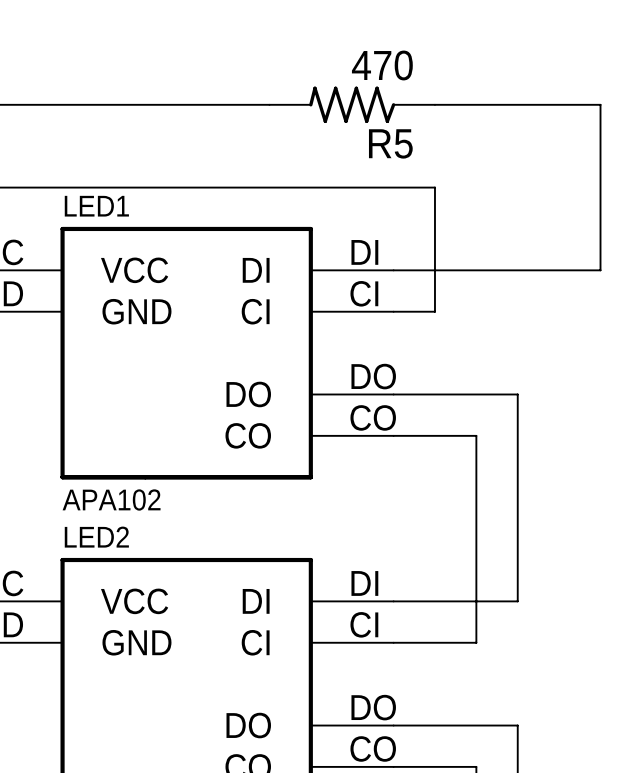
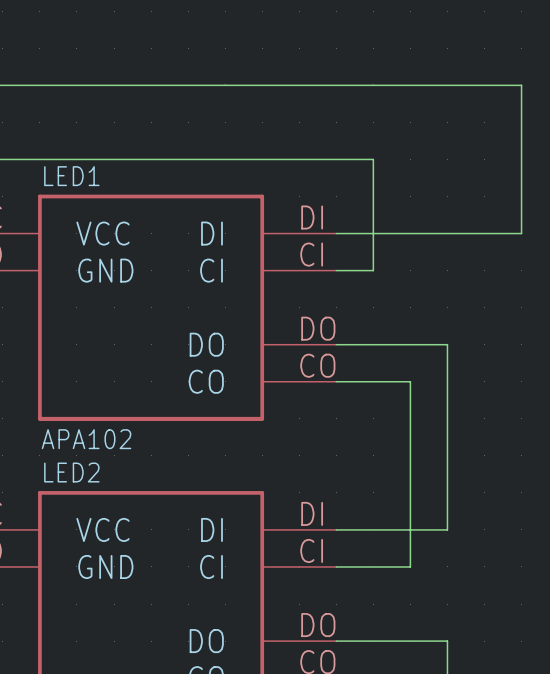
R5: 470 (352, 104) -> none

